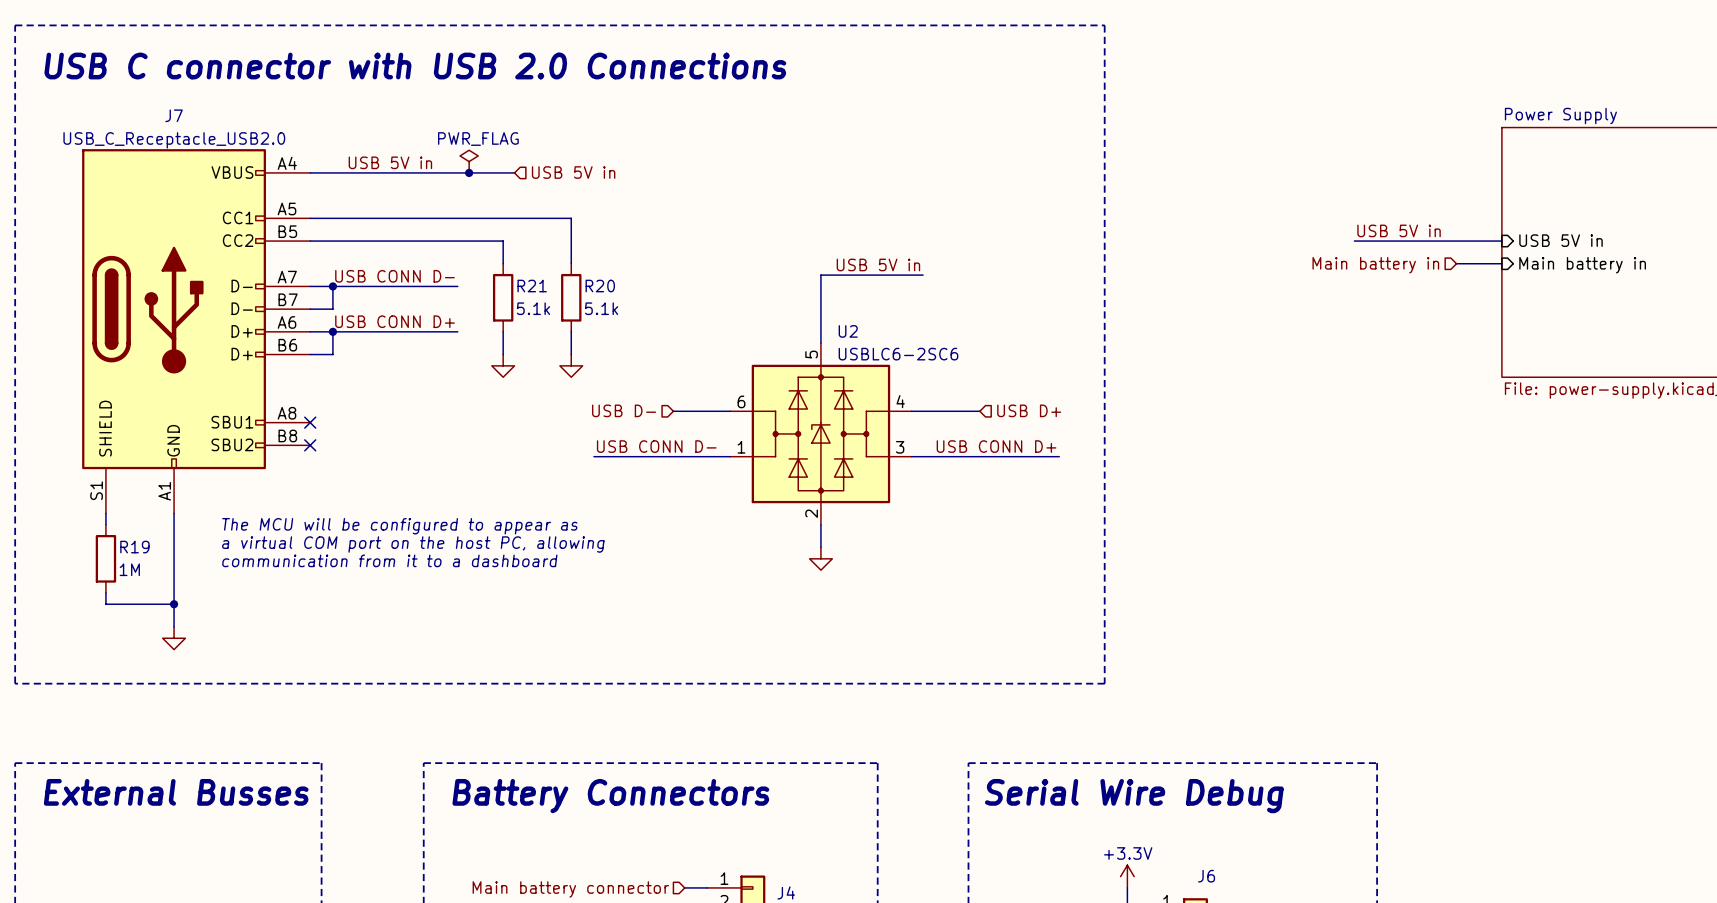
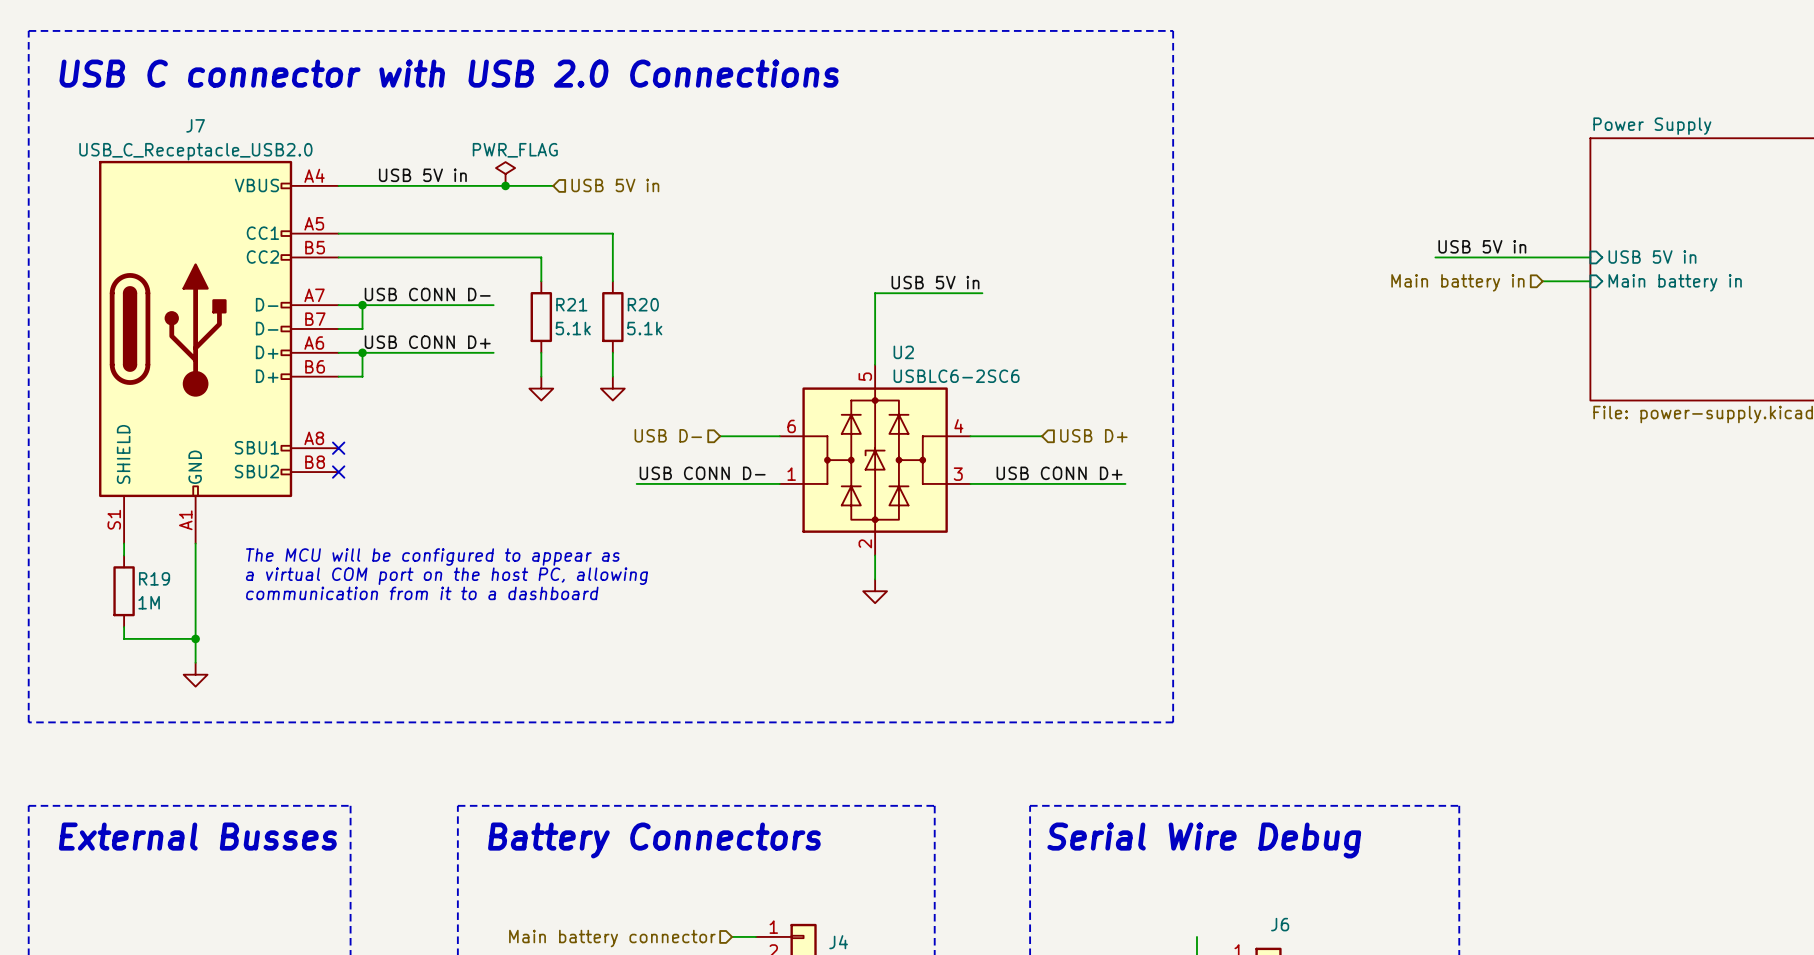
power symbol: +3.3V (1127, 876) -> none

